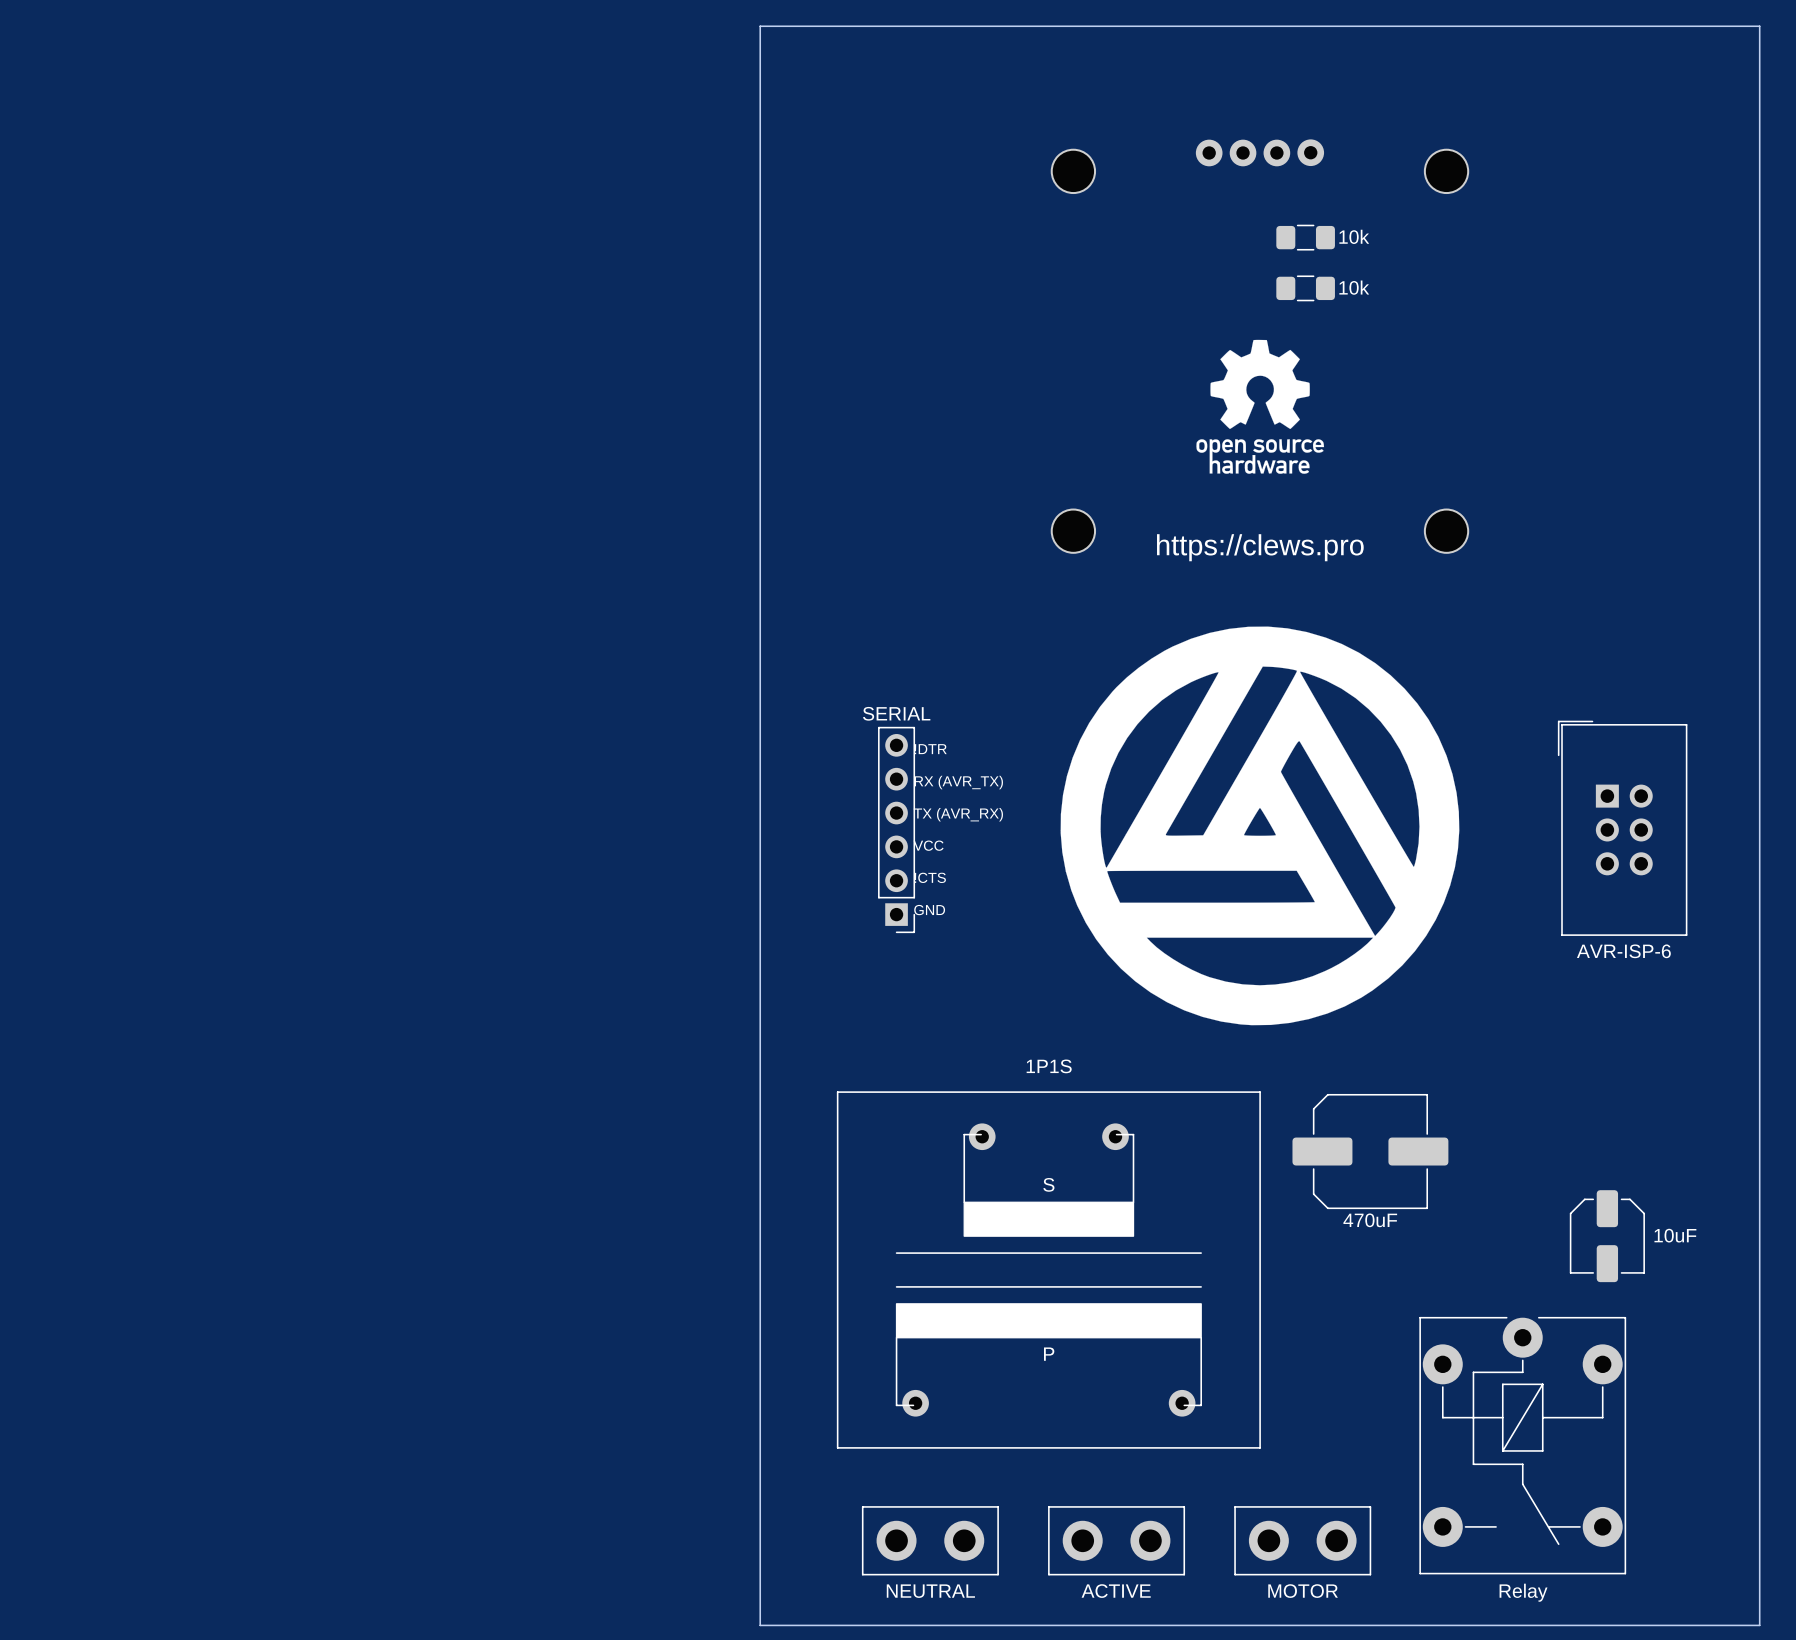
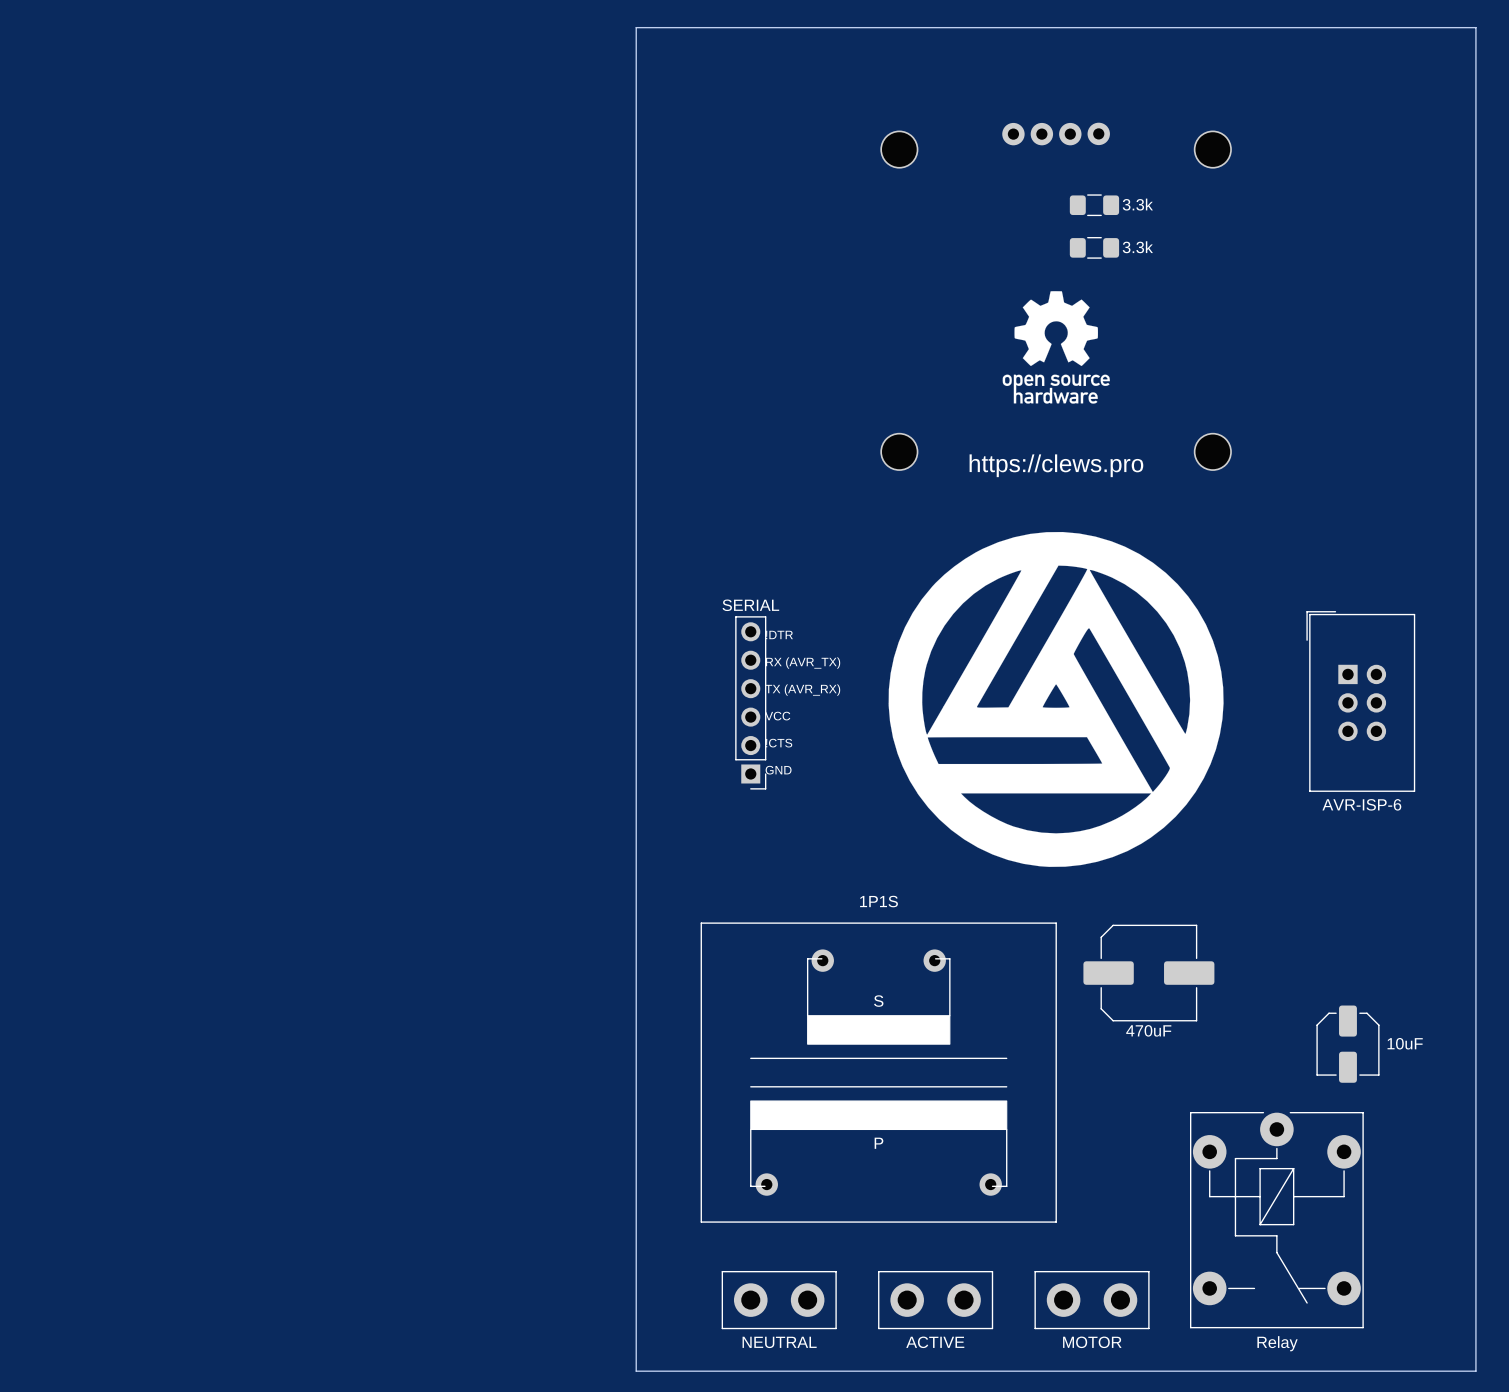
part value: 10k (1354, 236) -> 3.3k (1137, 204)
part value: 10k (1354, 287) -> 3.3k (1137, 247)

